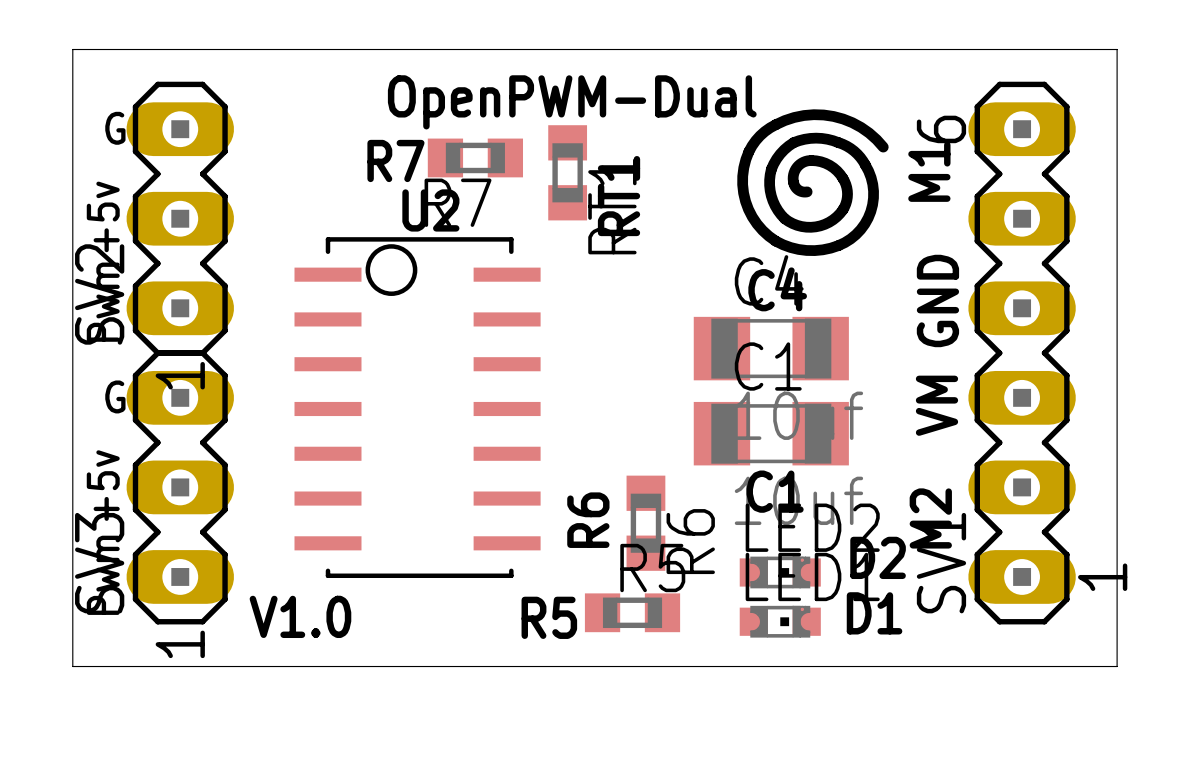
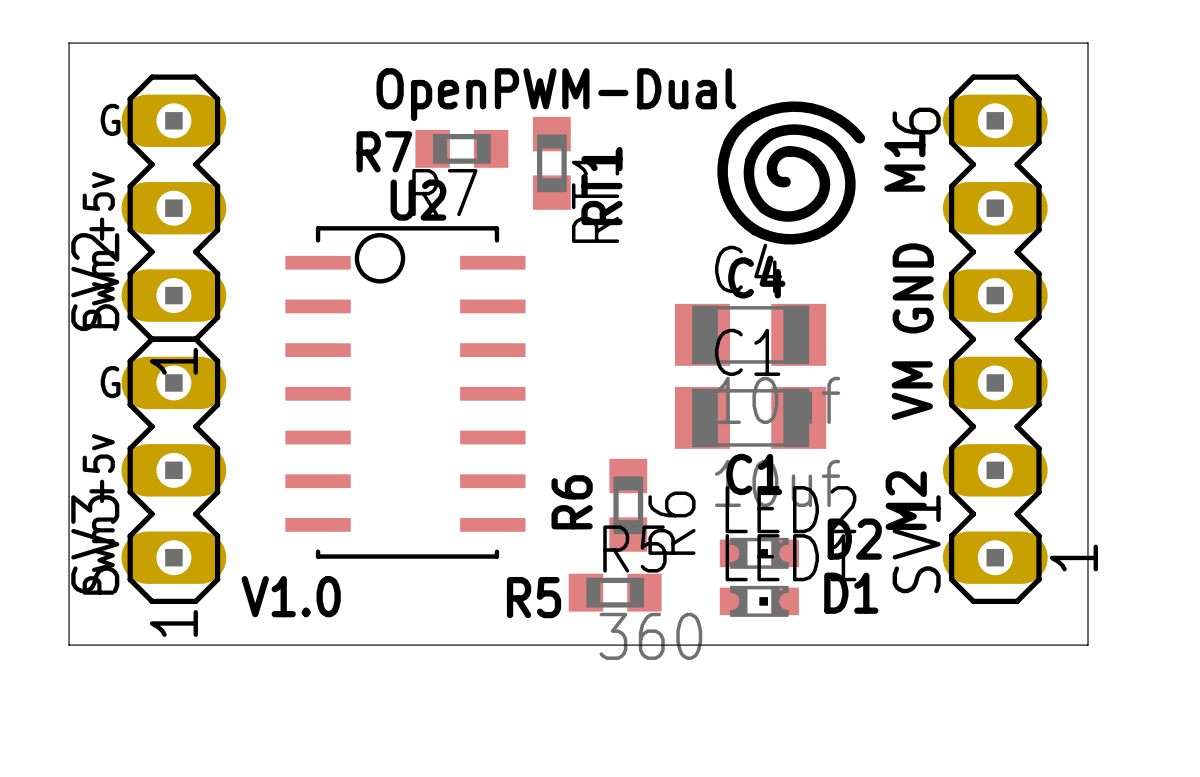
R5 value: none -> 360 (650, 636)

